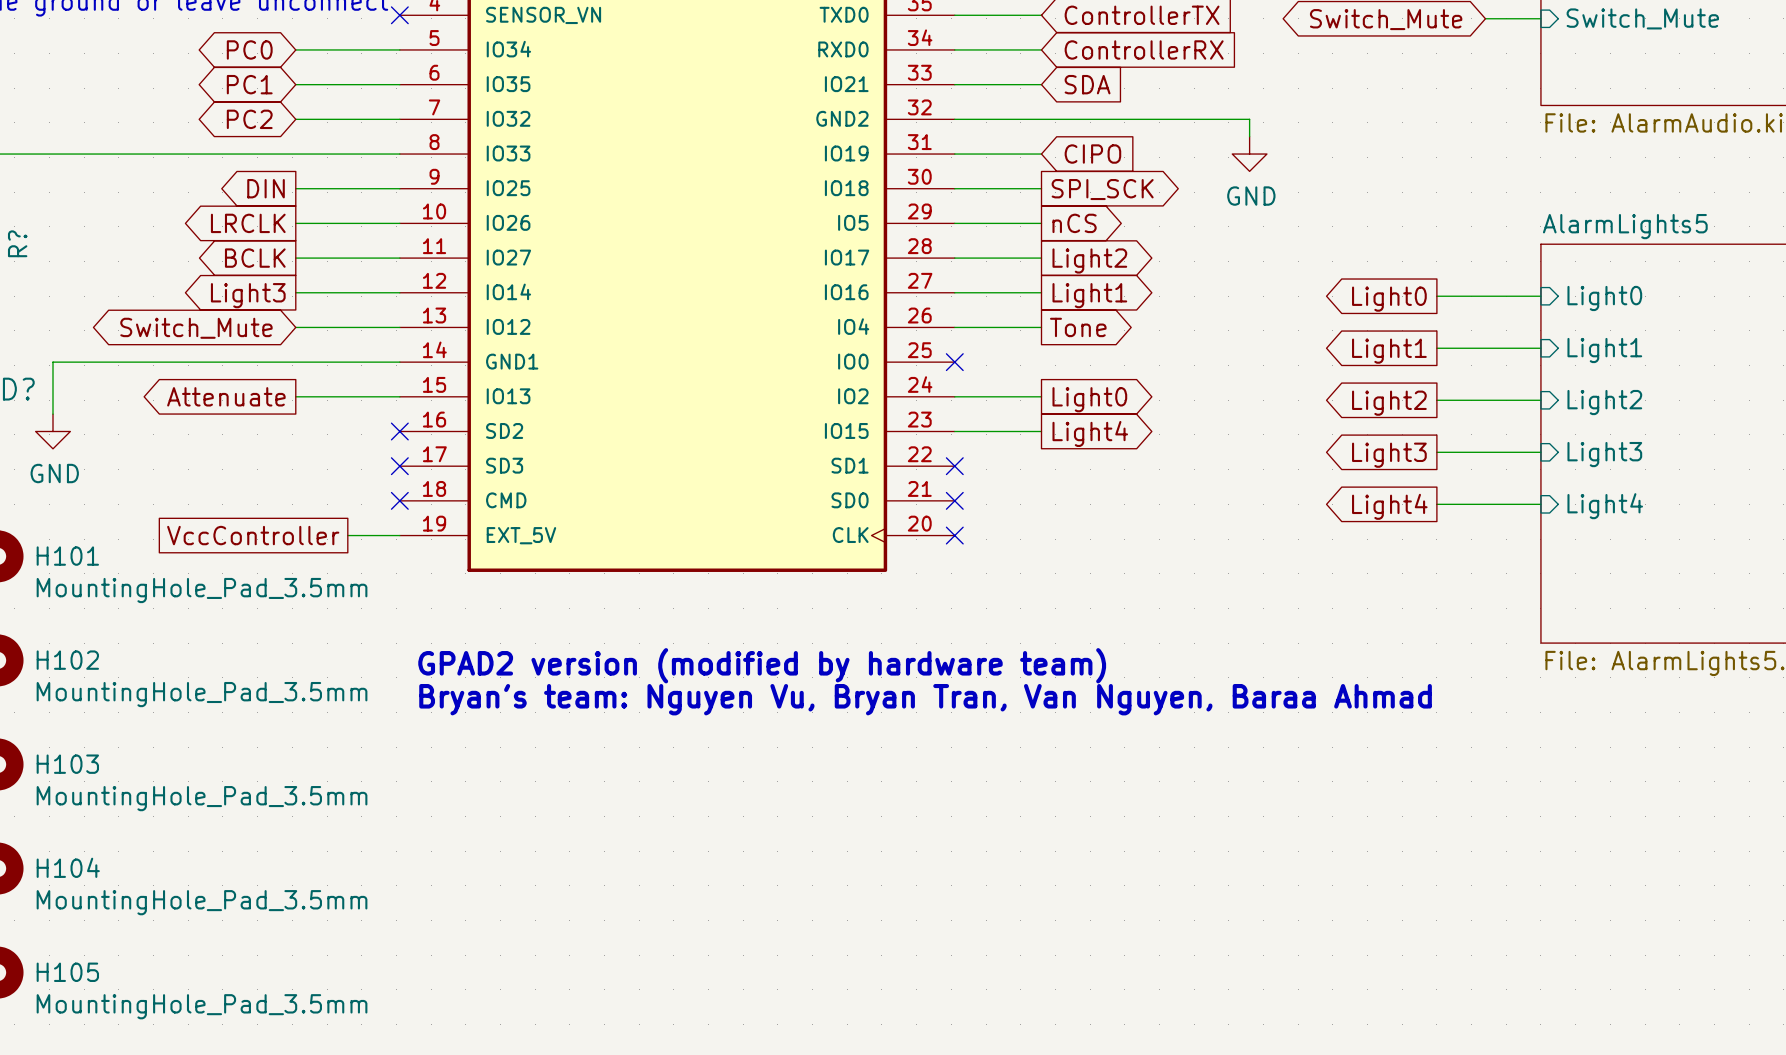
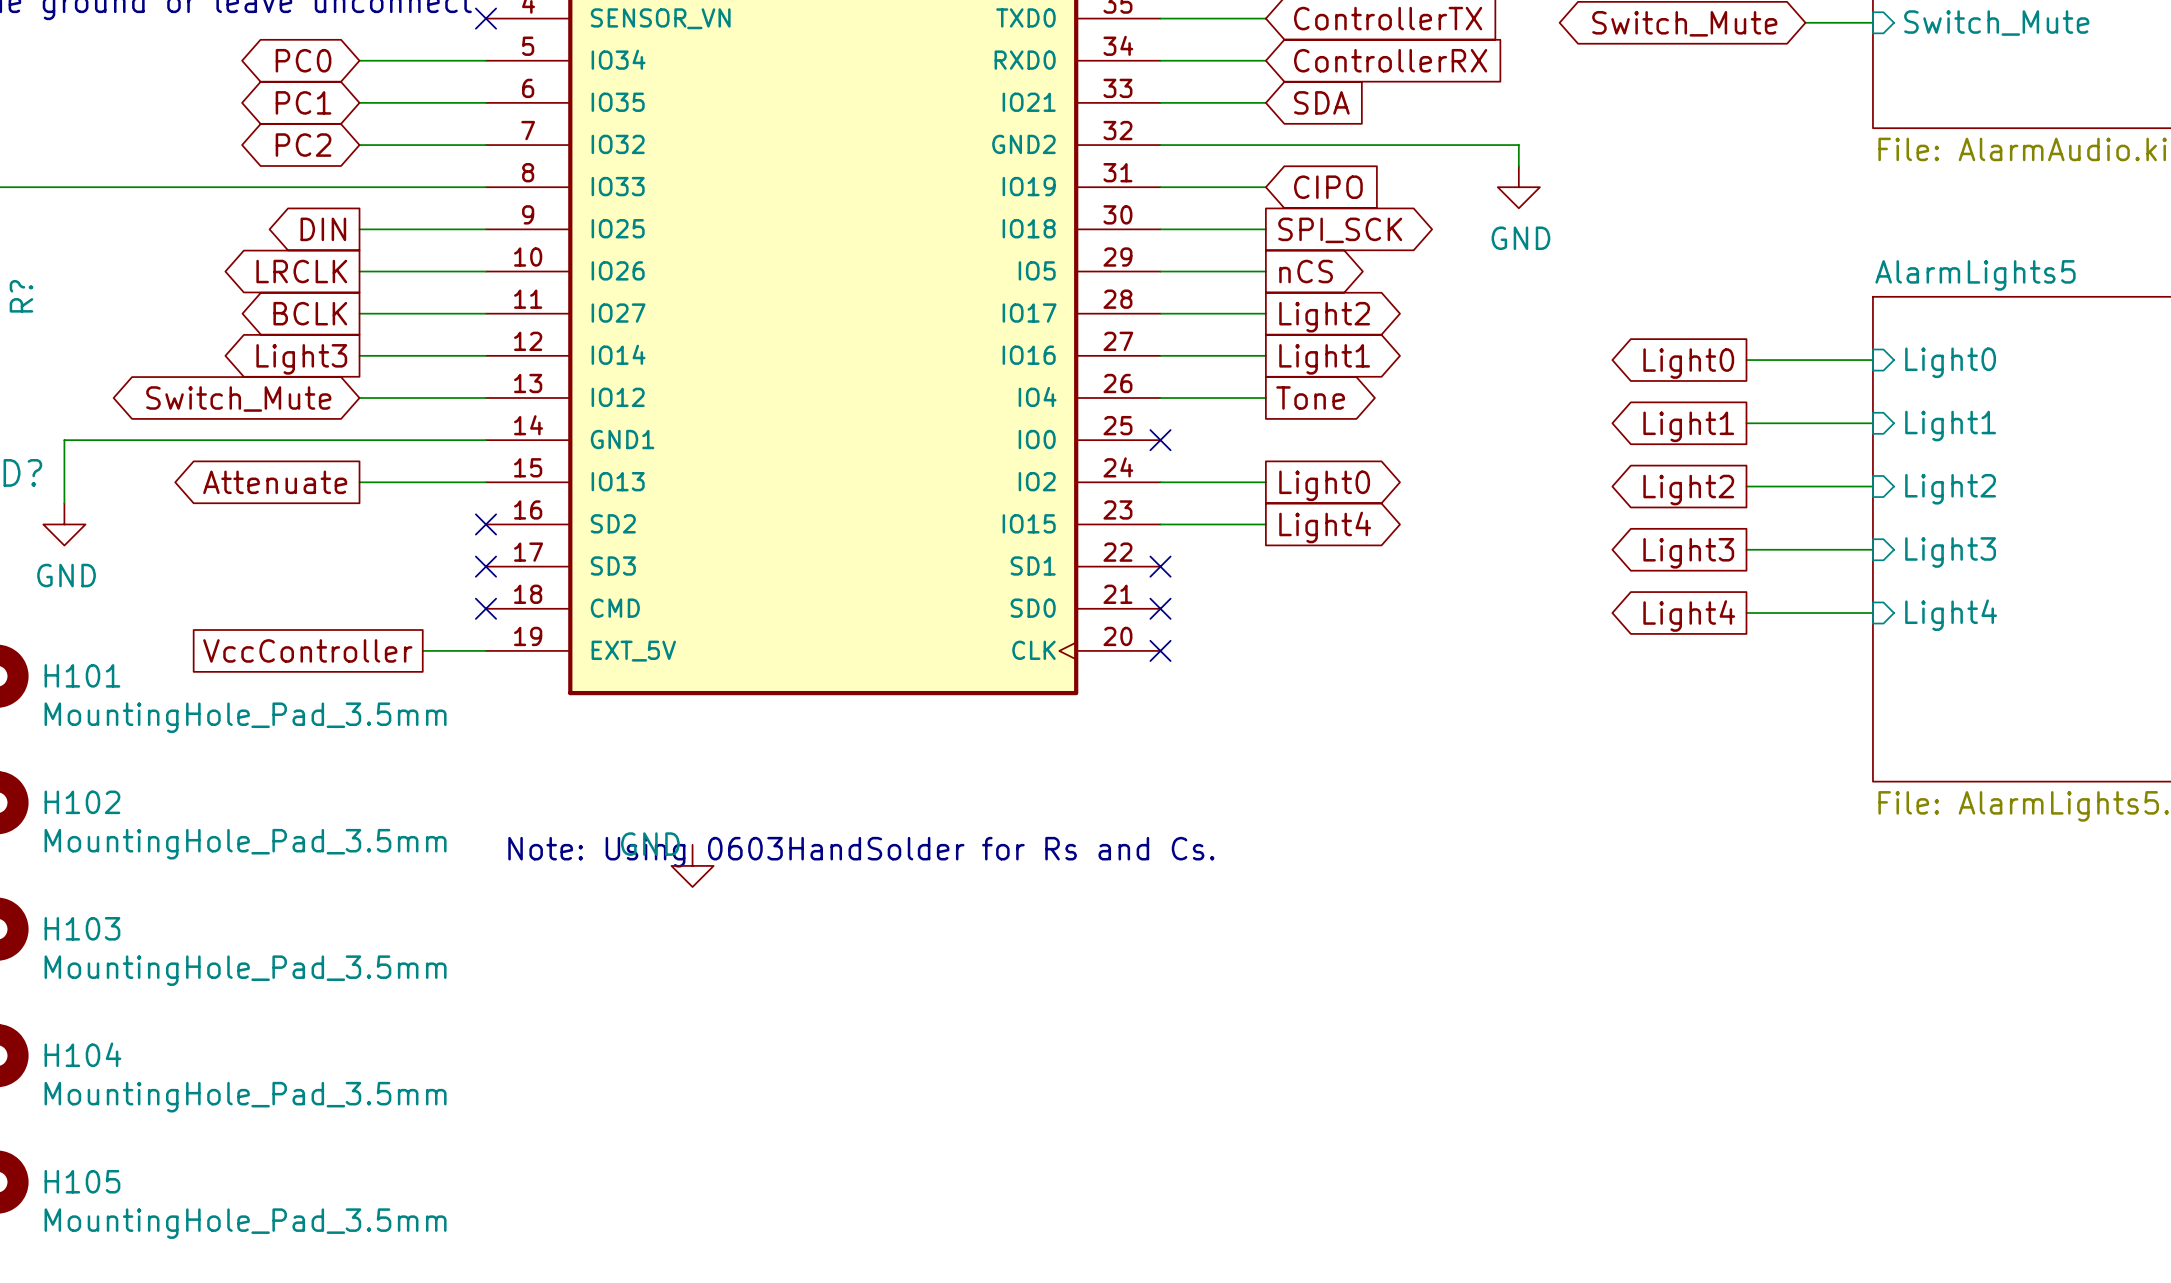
text: GPAD2 version (modified by hardware team) (762, 665) -> none
text: Bryan's team: Nguyen Vu, Bryan Tran, Van Nguyen, Baraa Ahmad (925, 699) -> Note: Using 0603HandSolder for Rs and Cs. (861, 852)
power symbol: none -> GND (692, 865)

